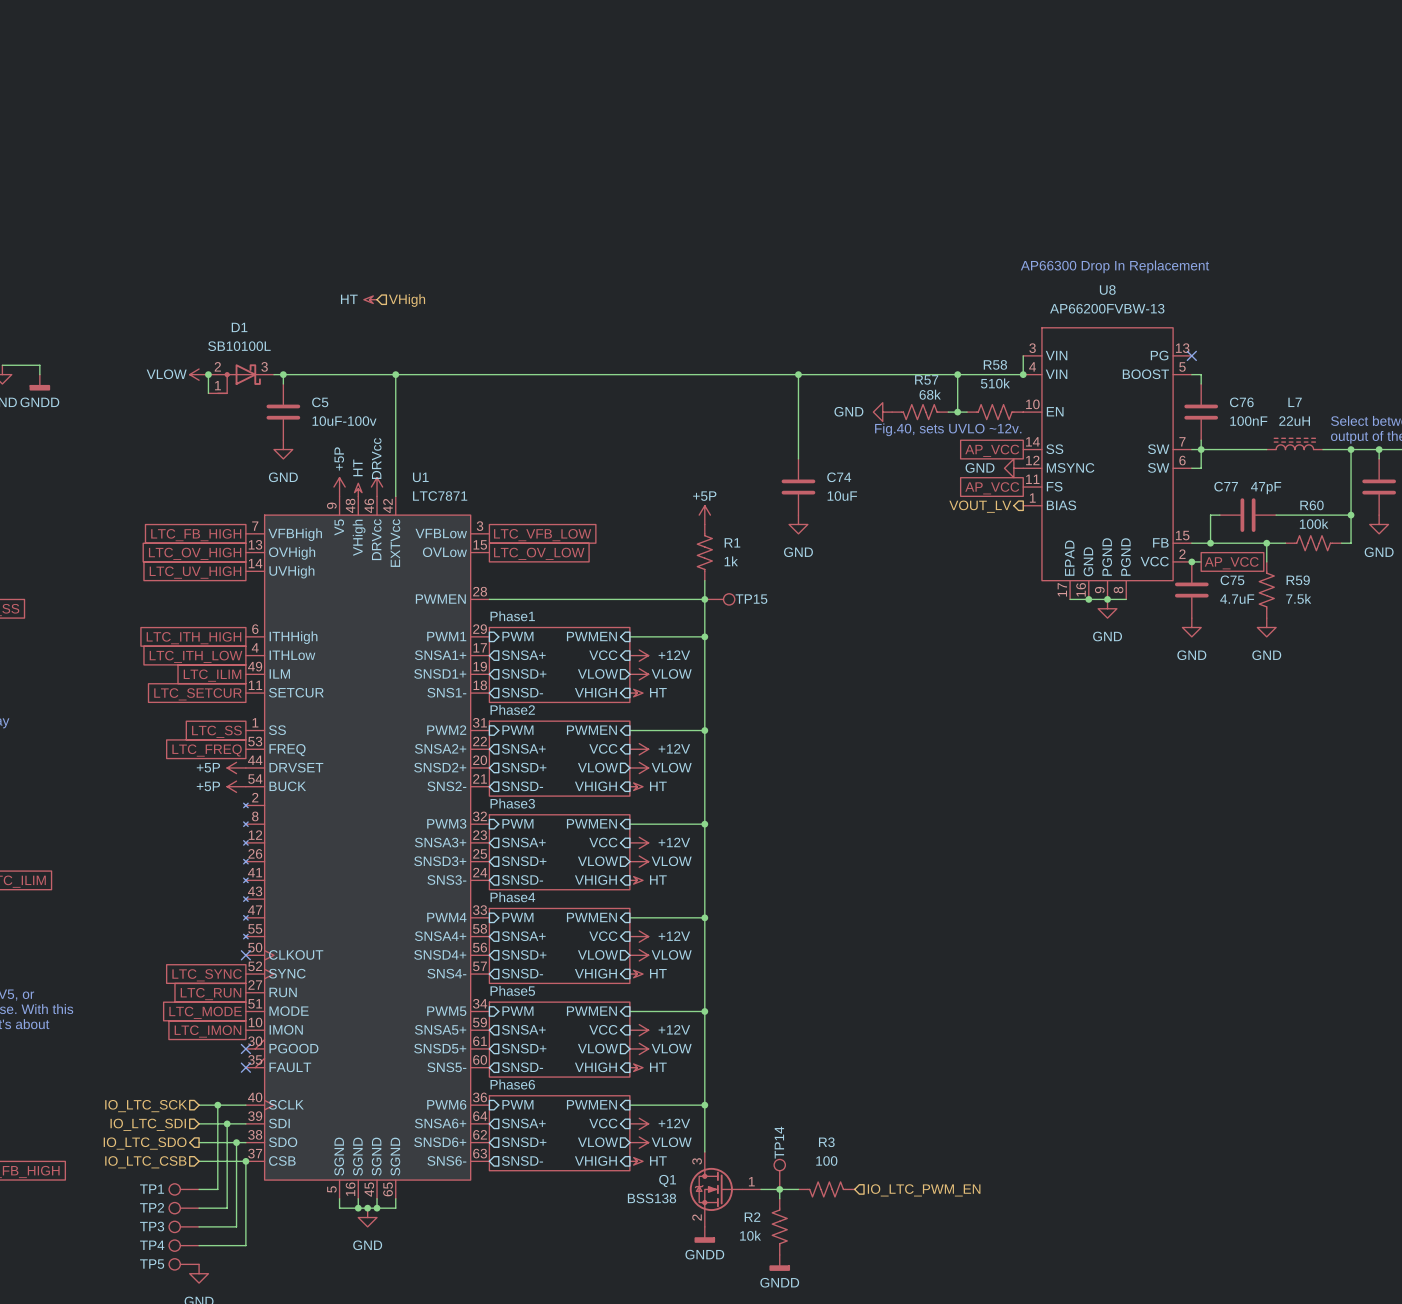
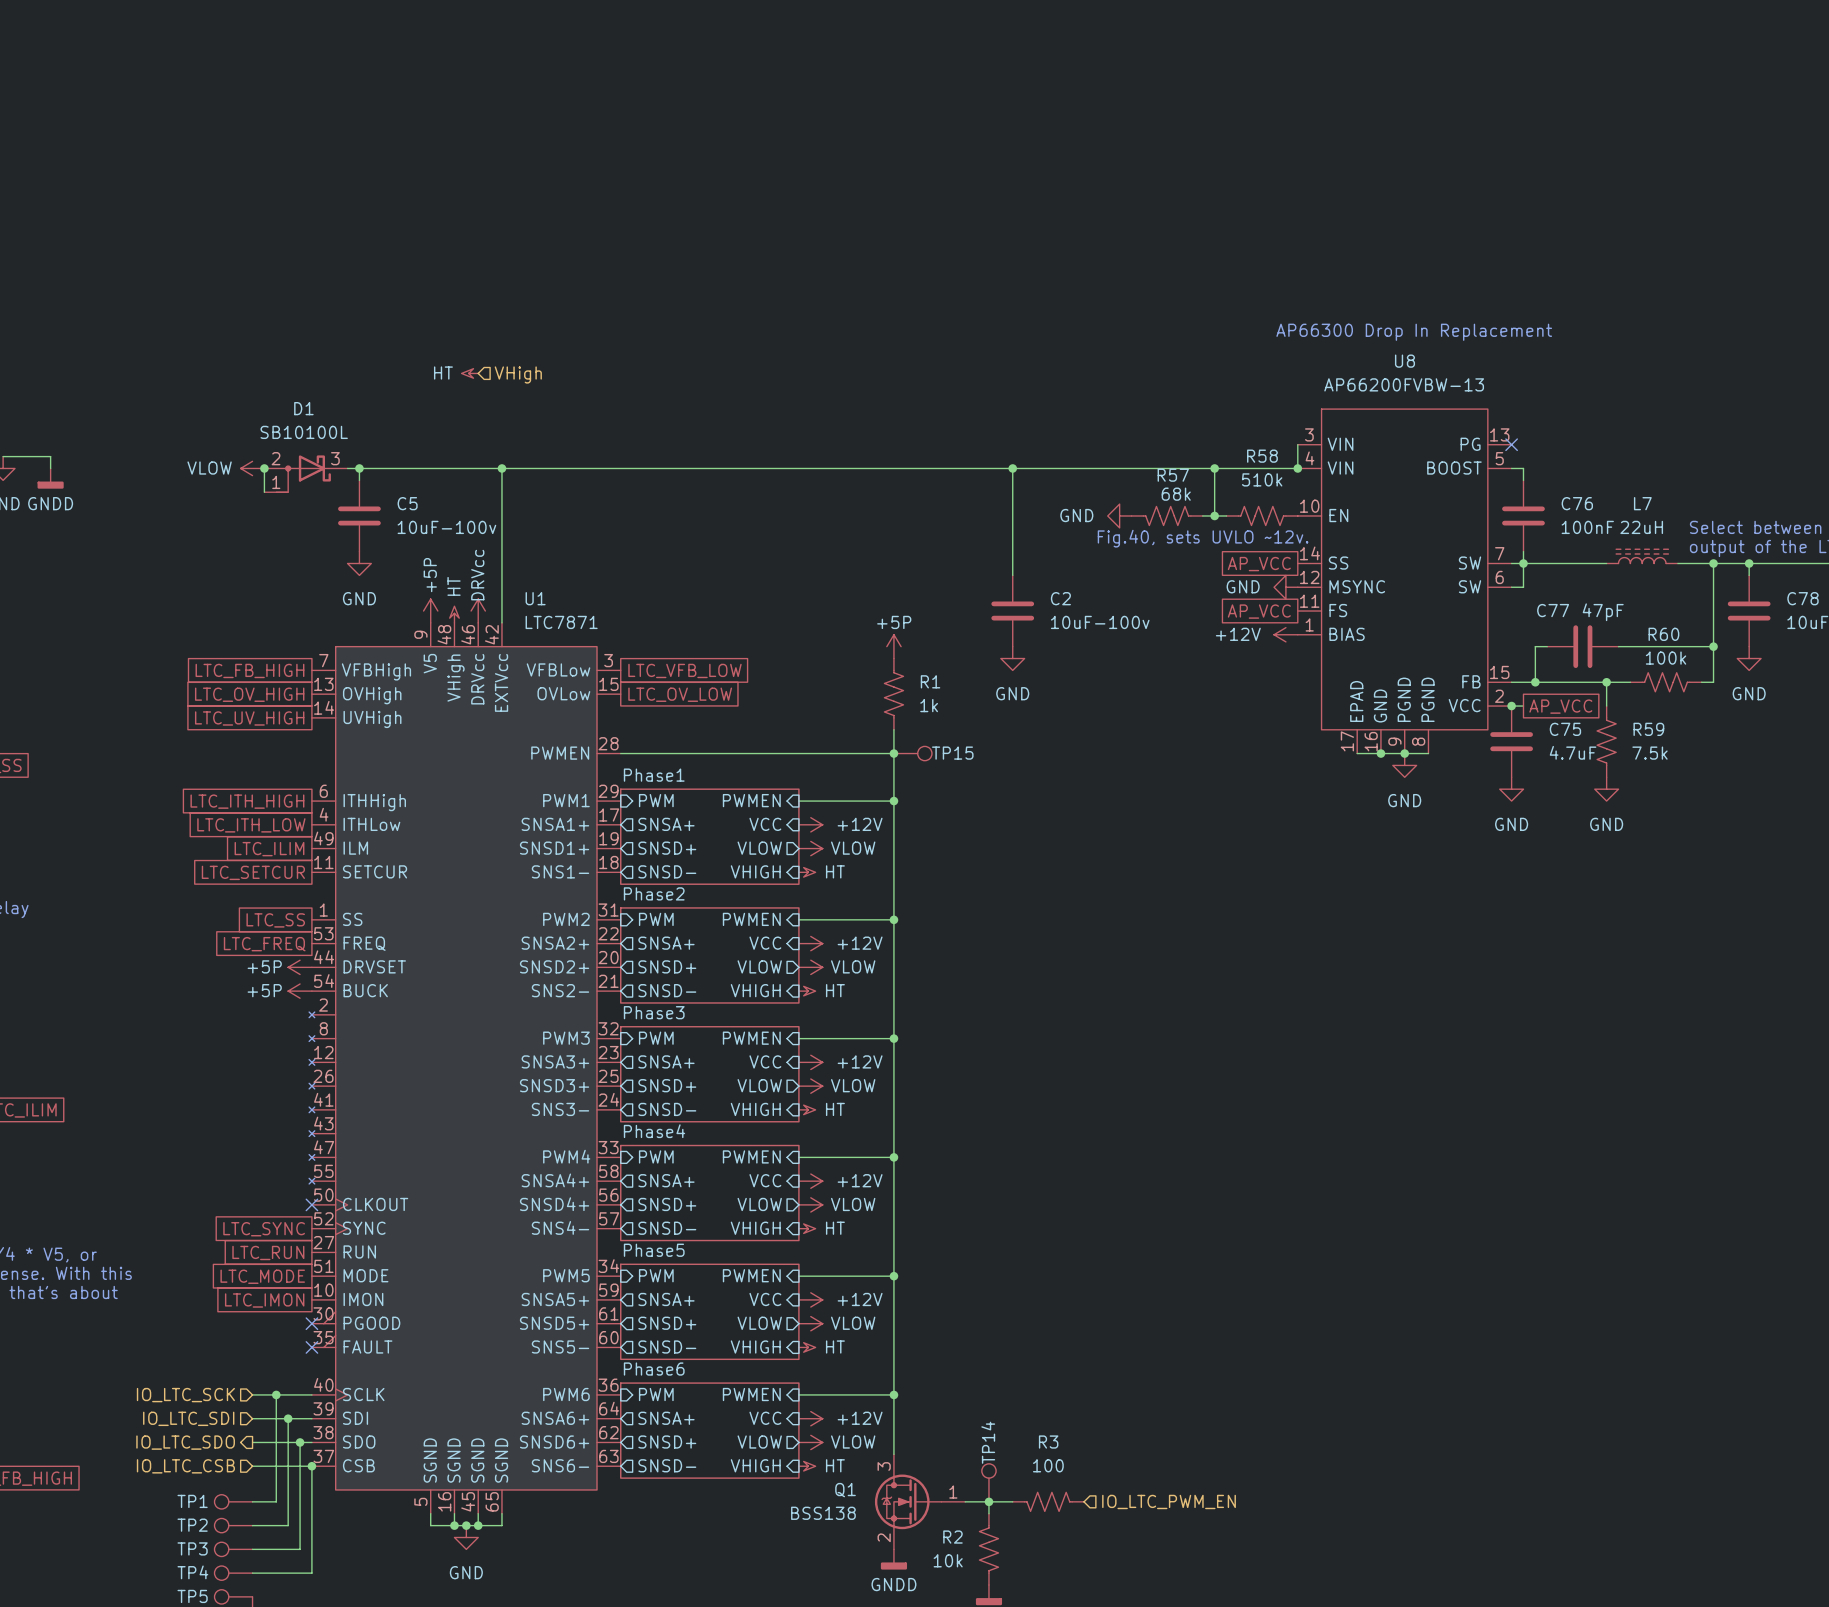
C74 name: C74 (839, 477) -> C2 (1060, 598)
C74 value: 10uF (842, 496) -> 10uF-100v (1100, 622)
power symbol: none -> +12V (1285, 634)
hierarchical label: VOUT_LV (980, 506) -> none

